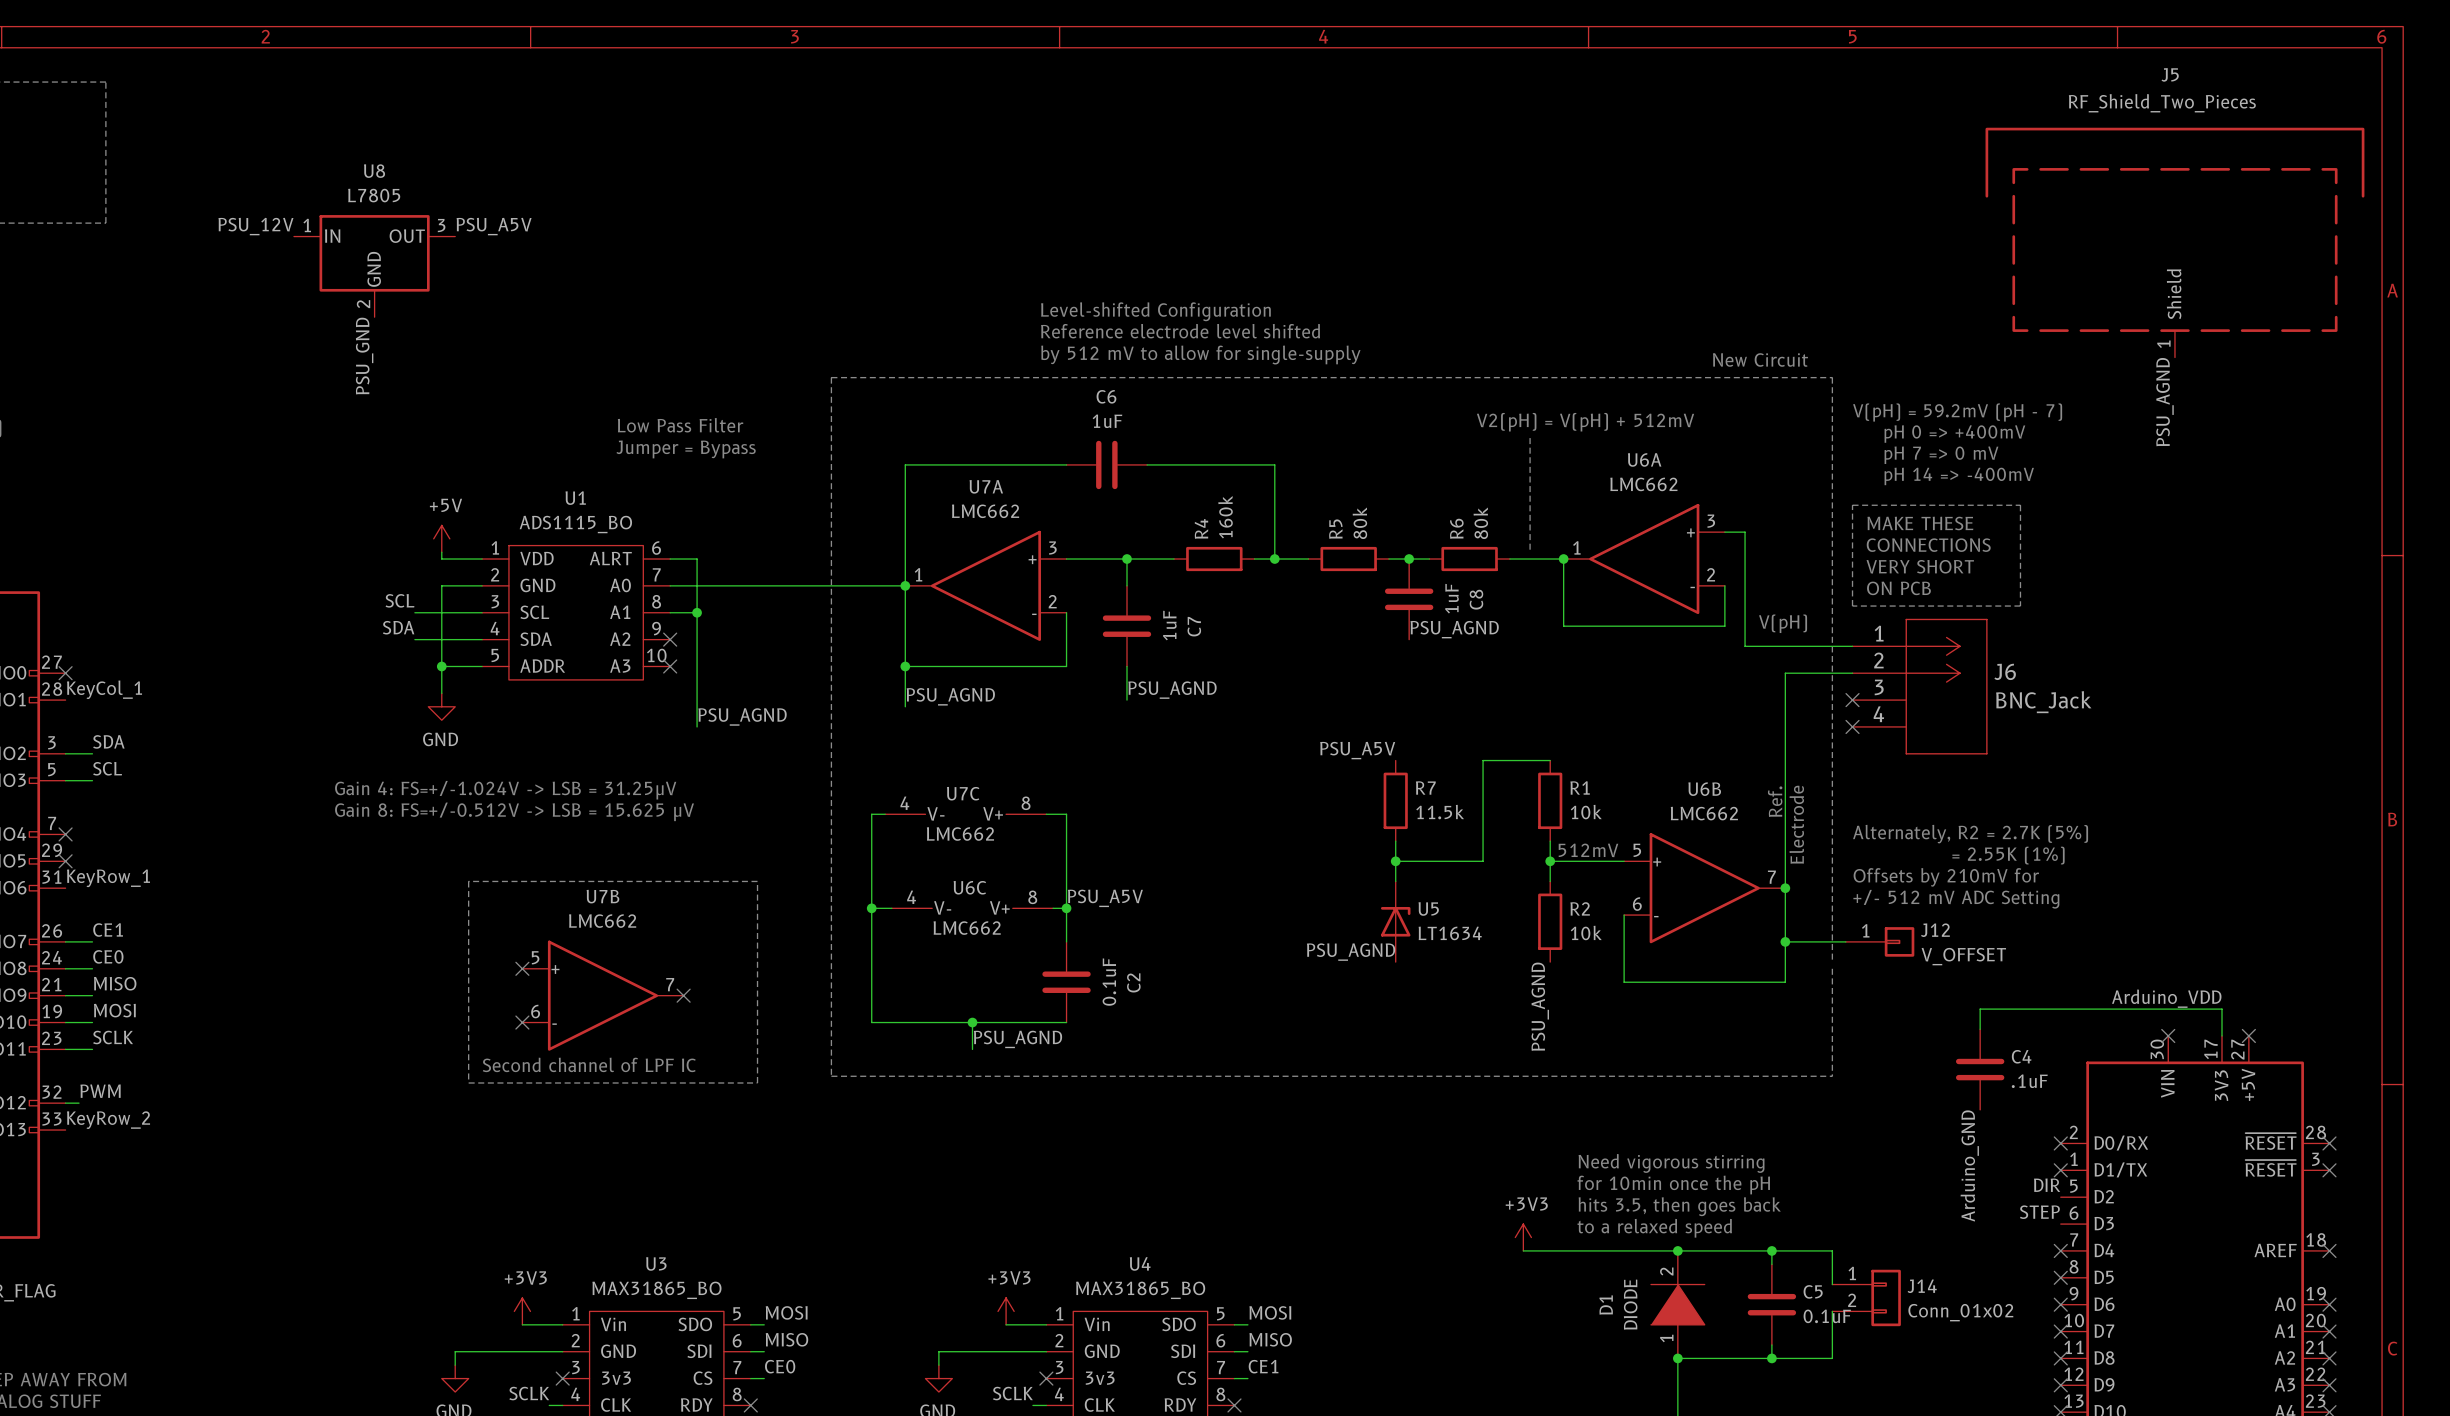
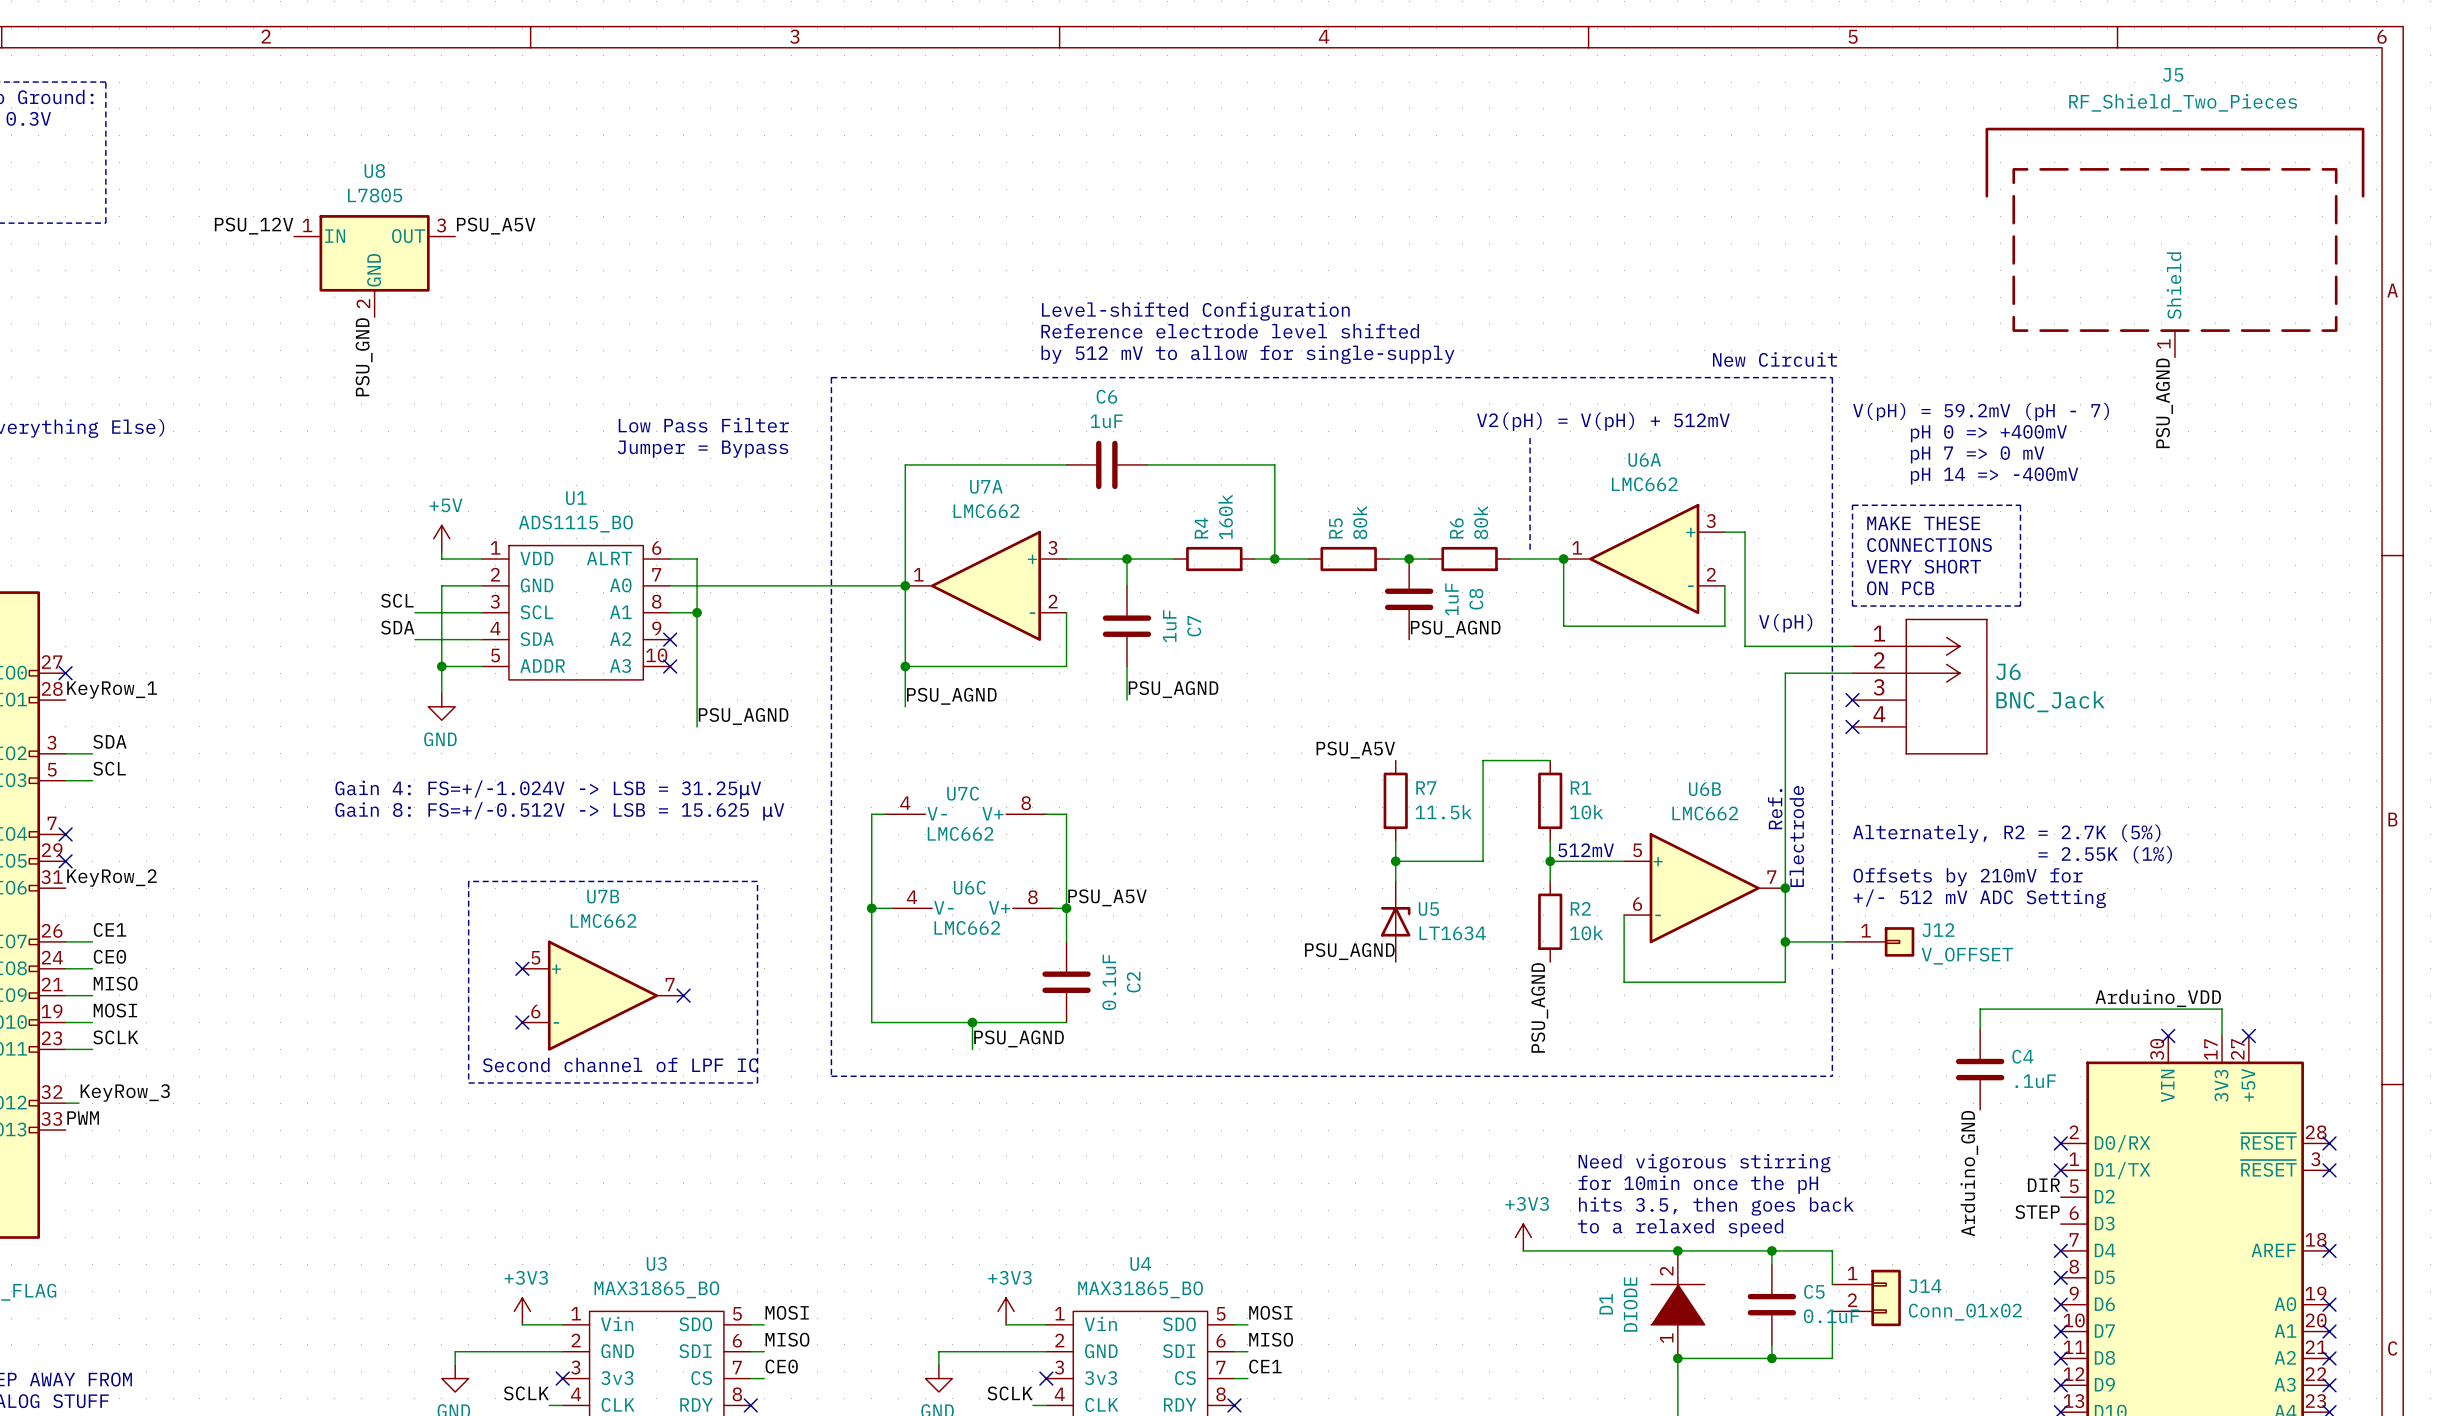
label: KeyCol_1 (104, 689) -> KeyRow_1 (112, 690)
label: KeyRow_1 (108, 878) -> KeyRow_2 (111, 878)
label: PWM (100, 1091) -> KeyRow_3 (125, 1092)
label: KeyRow_2 (108, 1120) -> PWM (83, 1118)

